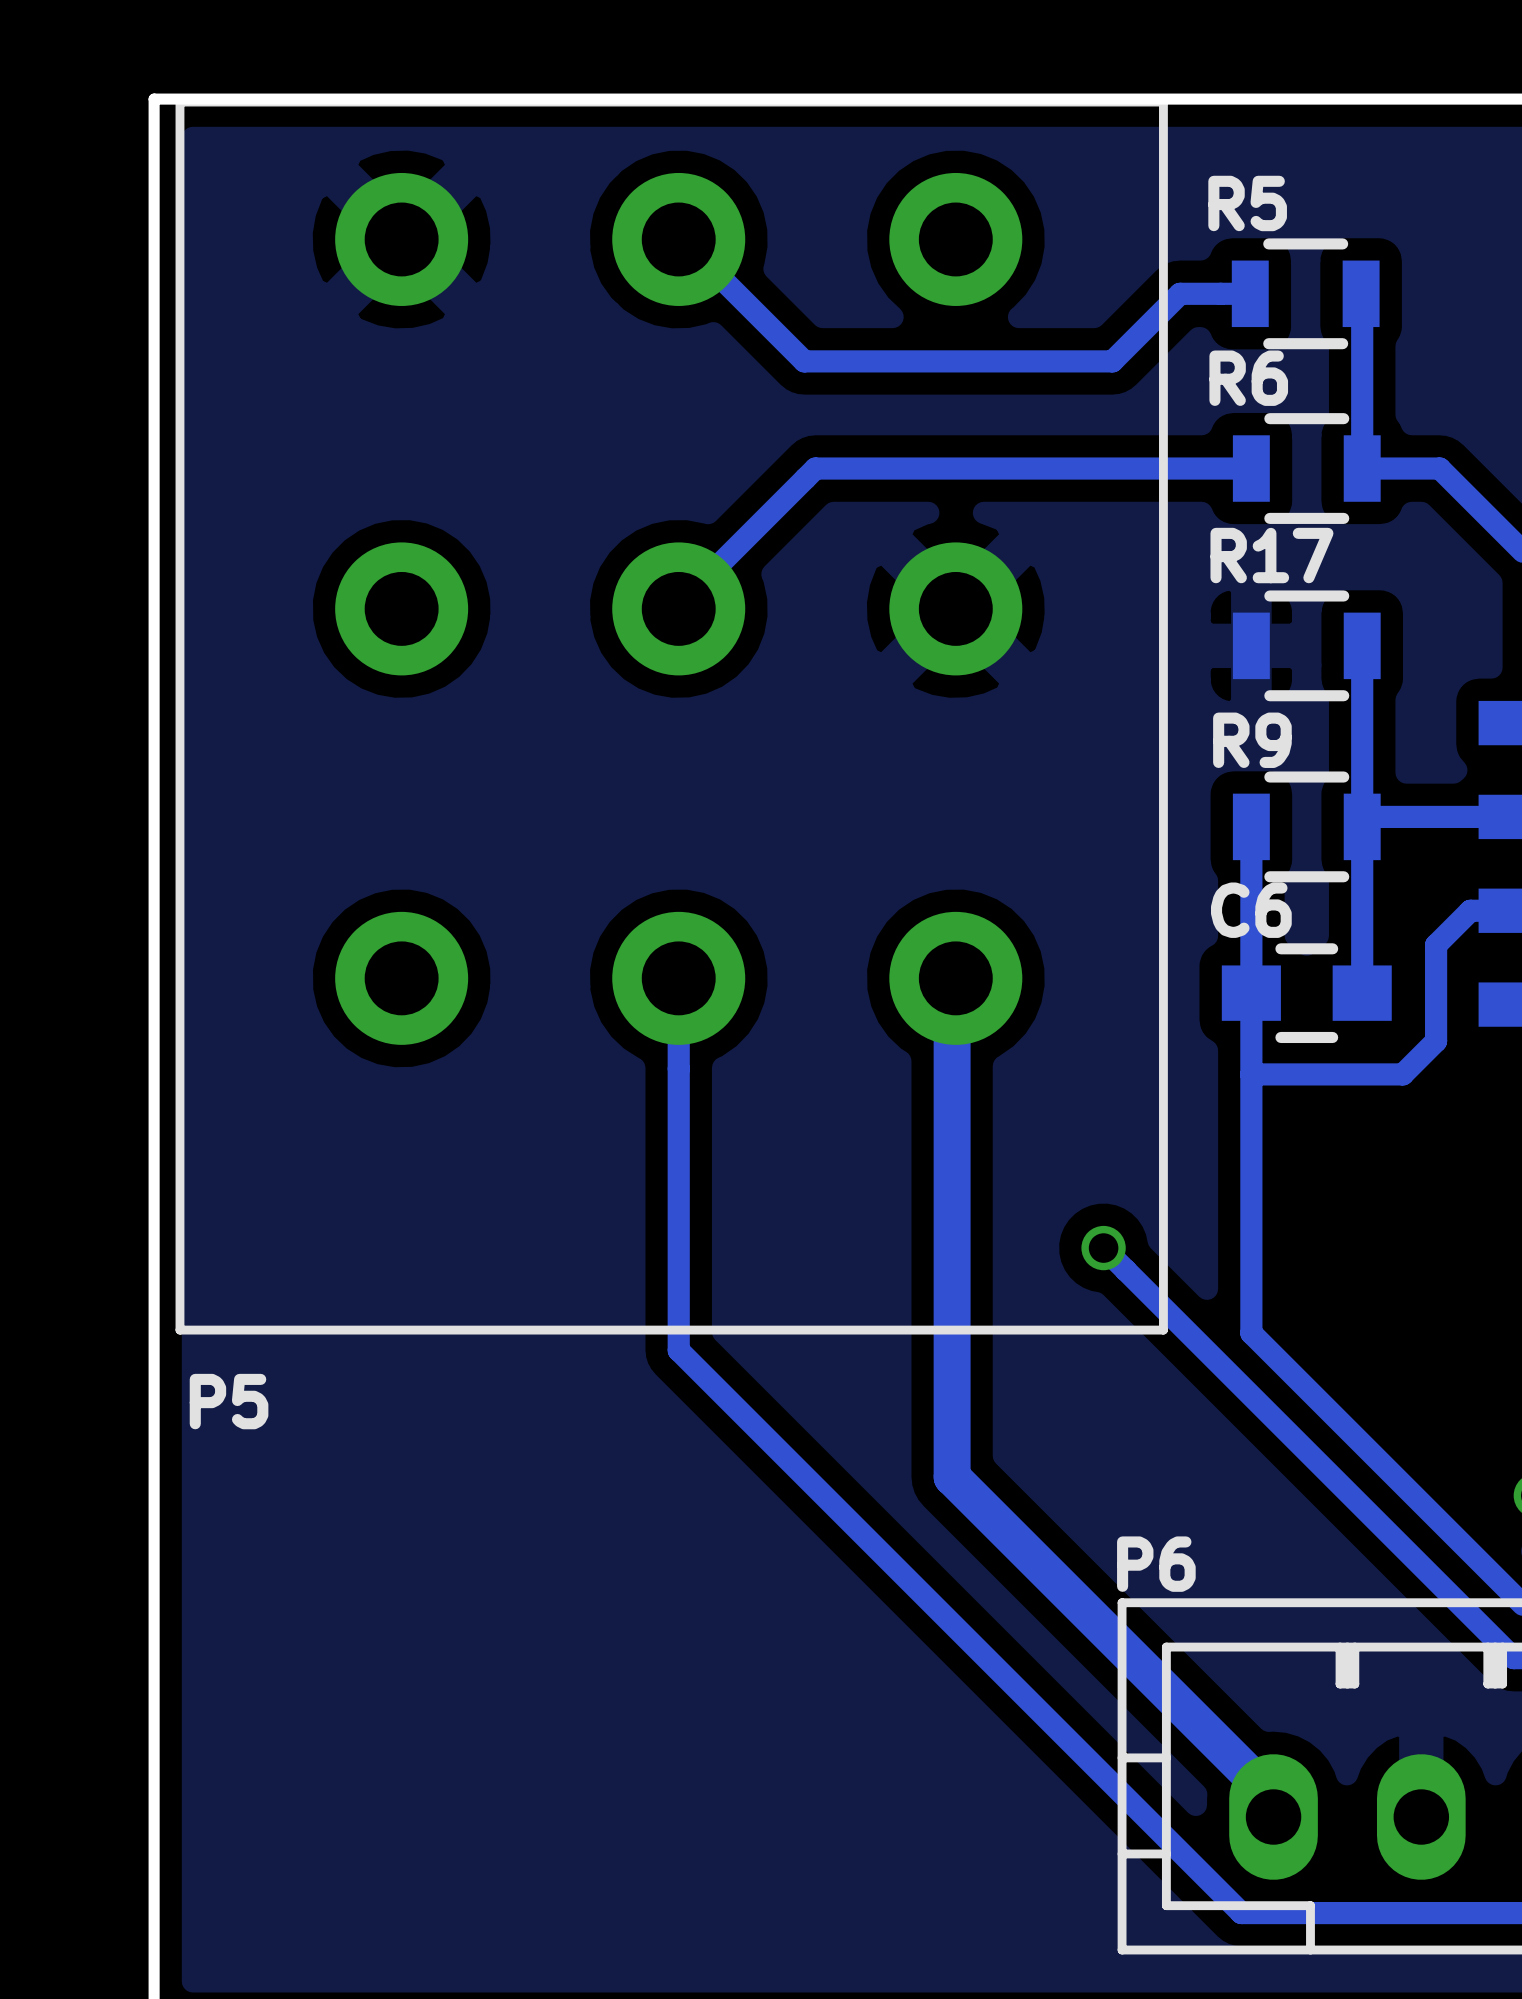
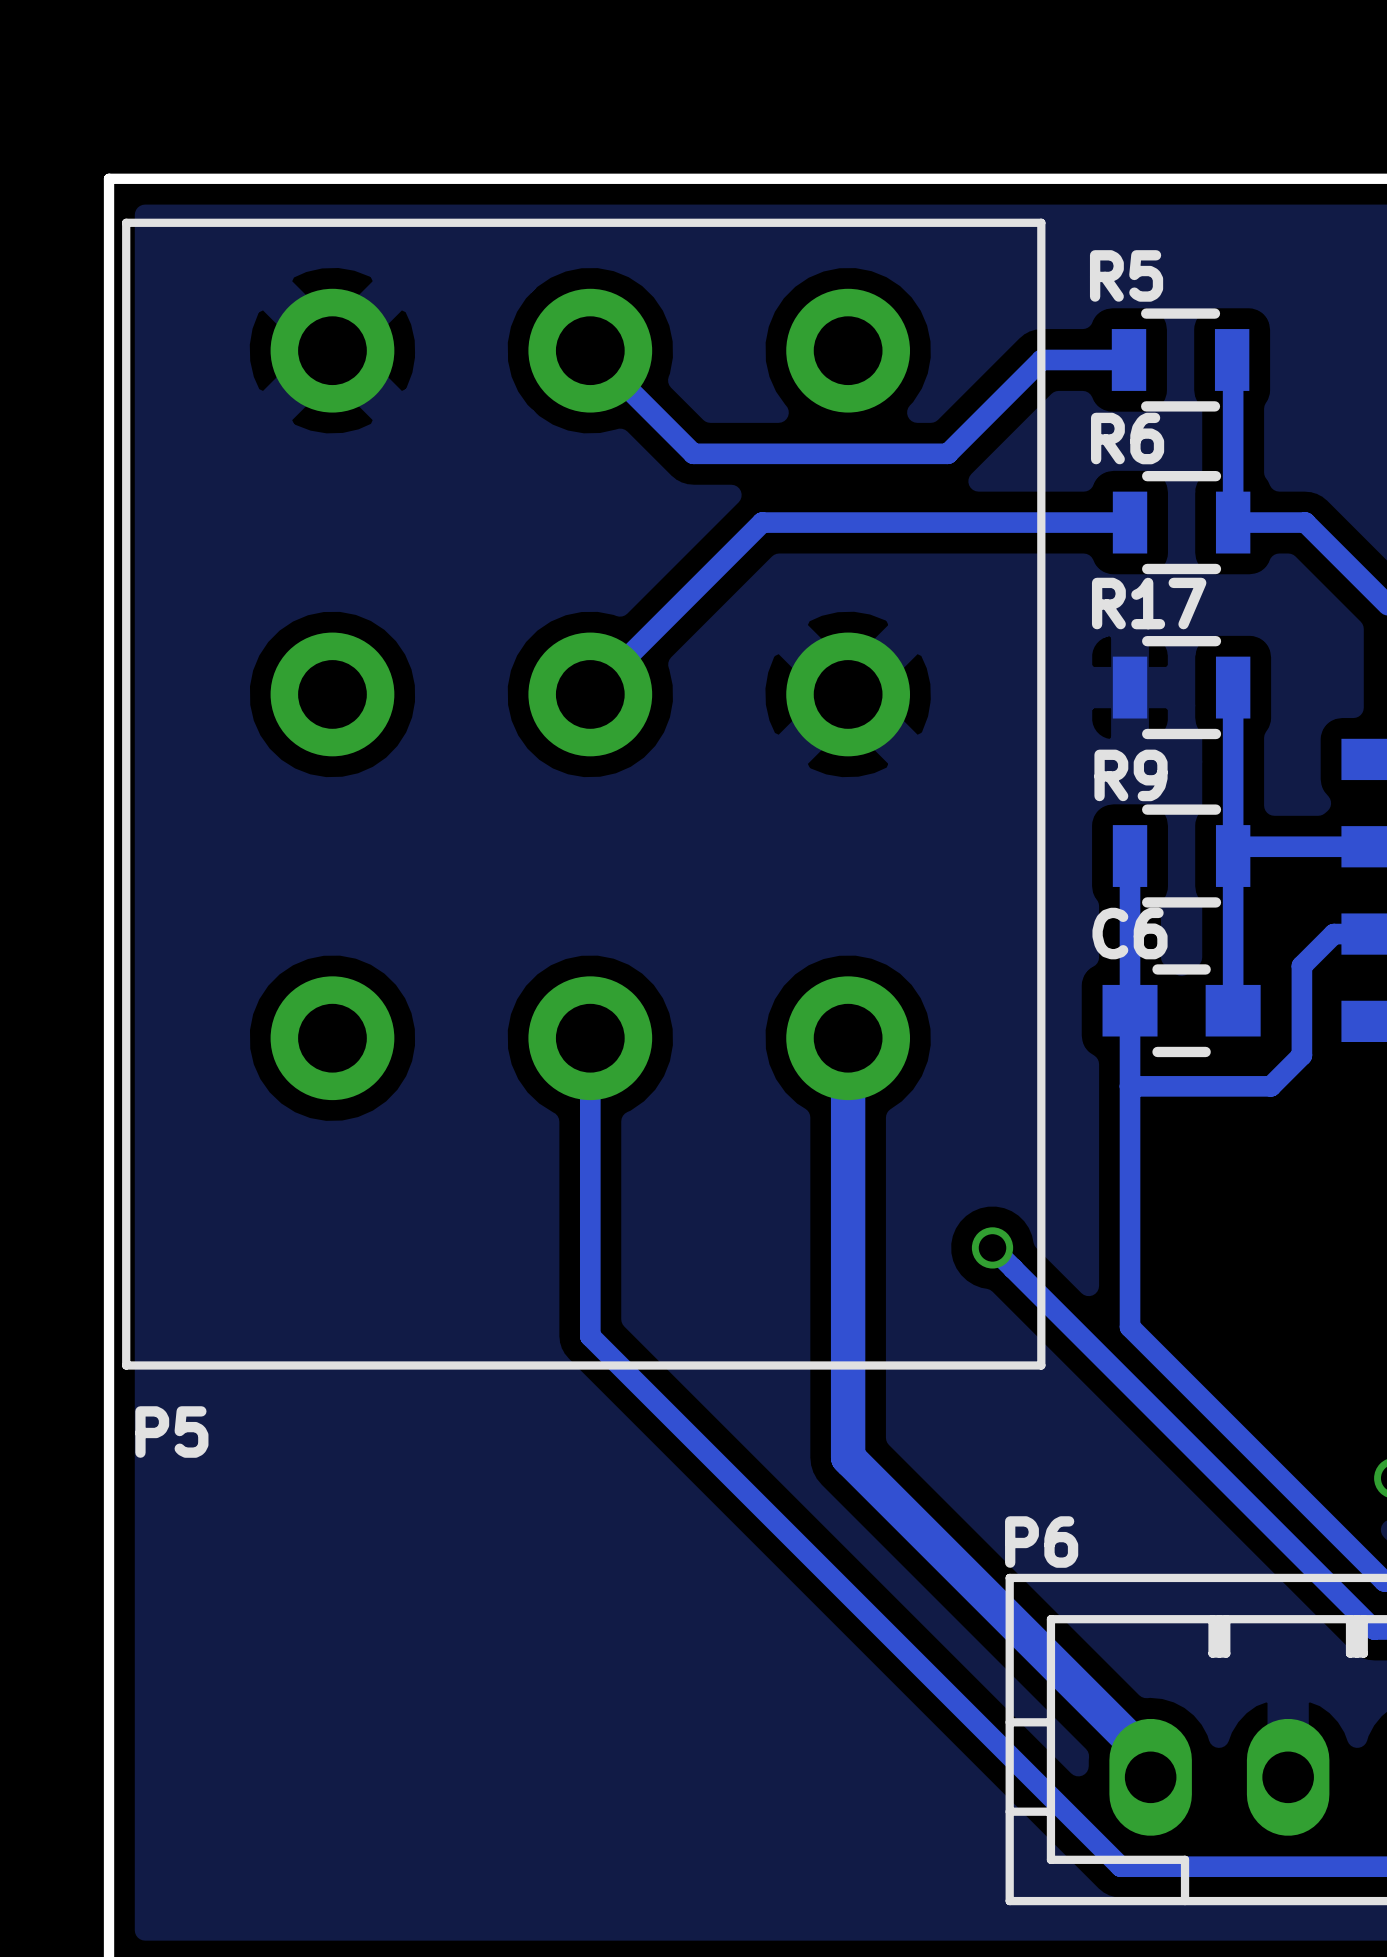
track: (678, 235) (804, 361) (1112, 361) (1180, 293) -> (590, 350) (693, 453) (947, 453) (1041, 359) (1063, 359)
track: (856, 468) (815, 468) (678, 605) -> (762, 522) (590, 694)
P5 position: (671, 716) -> (583, 794)
track: (678, 974) (678, 1350) -> (590, 1038) (590, 1336) (597, 1343)
track: (955, 974) (952, 978) (952, 1477) -> (848, 1038) (848, 1457) (851, 1461)

